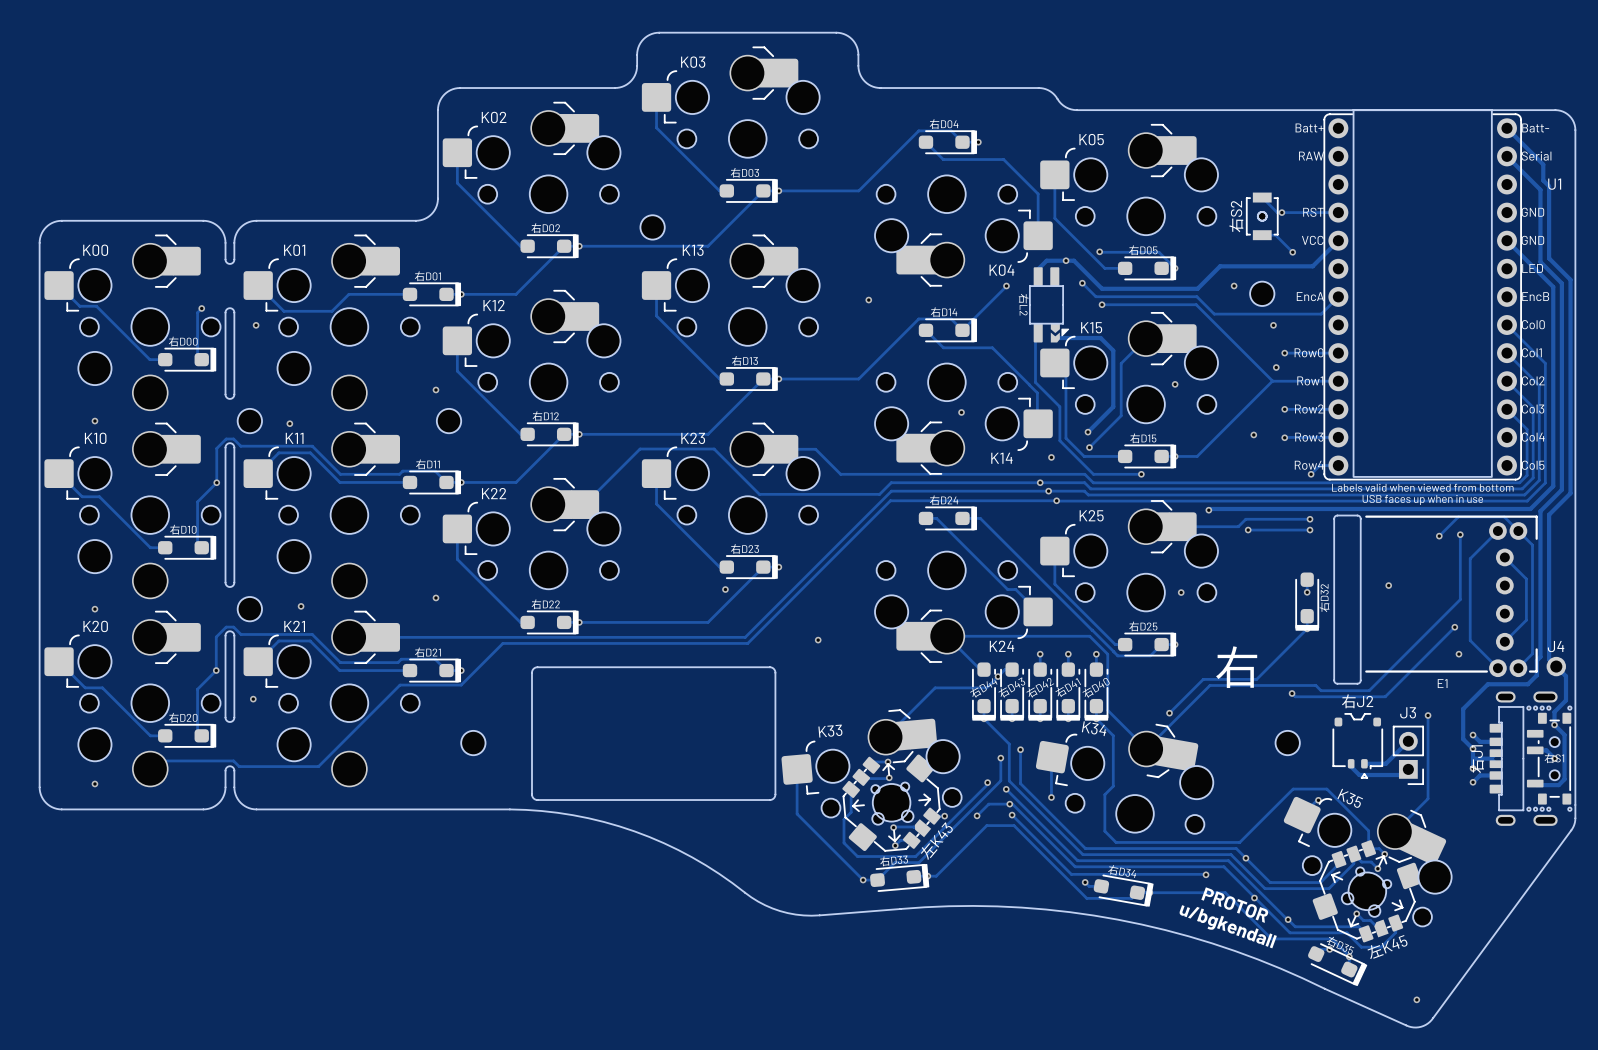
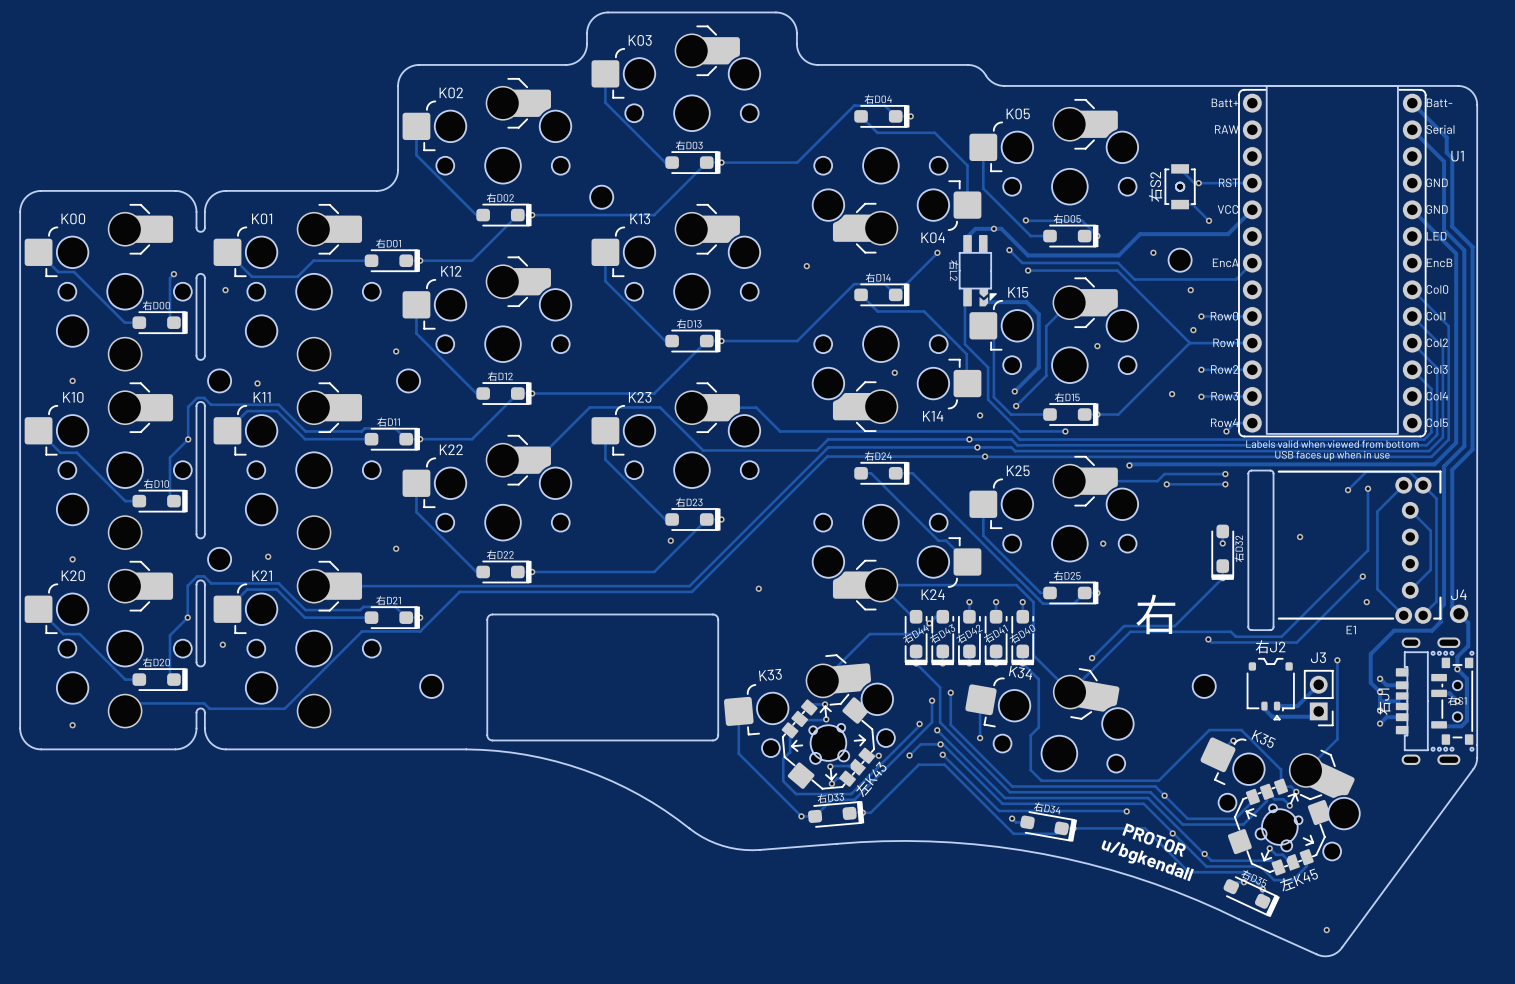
K03 footprint: [641, 46, 820, 158] -> [591, 25, 761, 132]
K02 footprint: [442, 102, 621, 214] -> [402, 78, 572, 184]
K05 footprint: [1040, 124, 1219, 236] -> [969, 99, 1139, 205]
K04 footprint: [875, 175, 1053, 287] -> [812, 147, 982, 254]
K13 footprint: [641, 234, 820, 346] -> [591, 204, 761, 310]
K12 footprint: [442, 290, 621, 402] -> [402, 256, 572, 363]
K15 footprint: [1040, 312, 1219, 424] -> [969, 277, 1139, 384]
K14 footprint: [875, 363, 1053, 475] -> [812, 326, 982, 432]
K23 footprint: [641, 422, 820, 534] -> [591, 382, 761, 489]
K22 footprint: [442, 478, 621, 590] -> [402, 435, 572, 541]
K25 footprint: [1040, 500, 1219, 612] -> [969, 456, 1139, 562]
K24 footprint: [875, 551, 1053, 663] -> [812, 504, 982, 611]
K33 footprint: [781, 709, 962, 822] -> [723, 654, 895, 761]
K34 footprint: [1035, 723, 1214, 834] -> [965, 668, 1134, 773]
K35 footprint: [1283, 796, 1452, 927] -> [1200, 737, 1360, 861]

